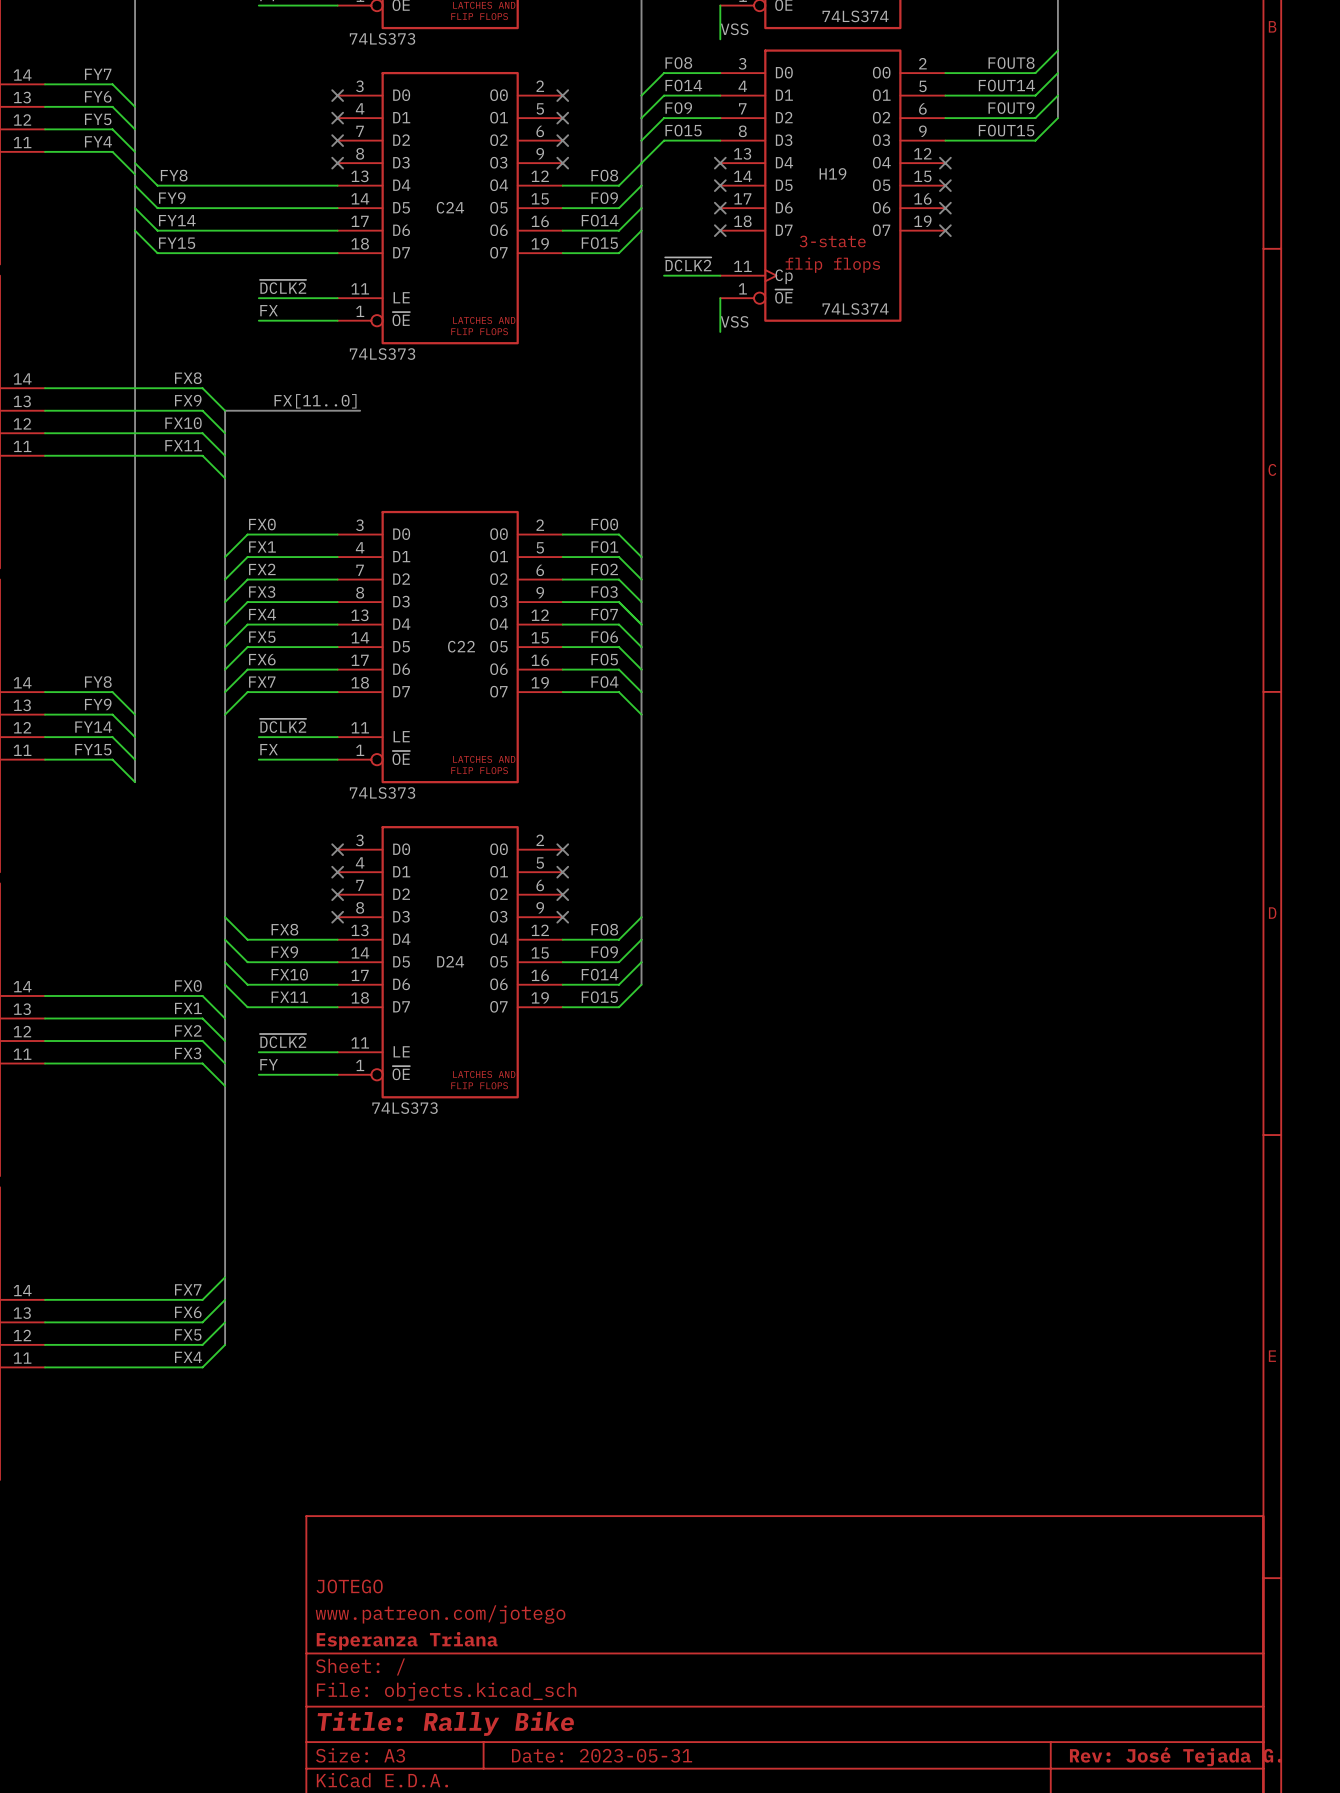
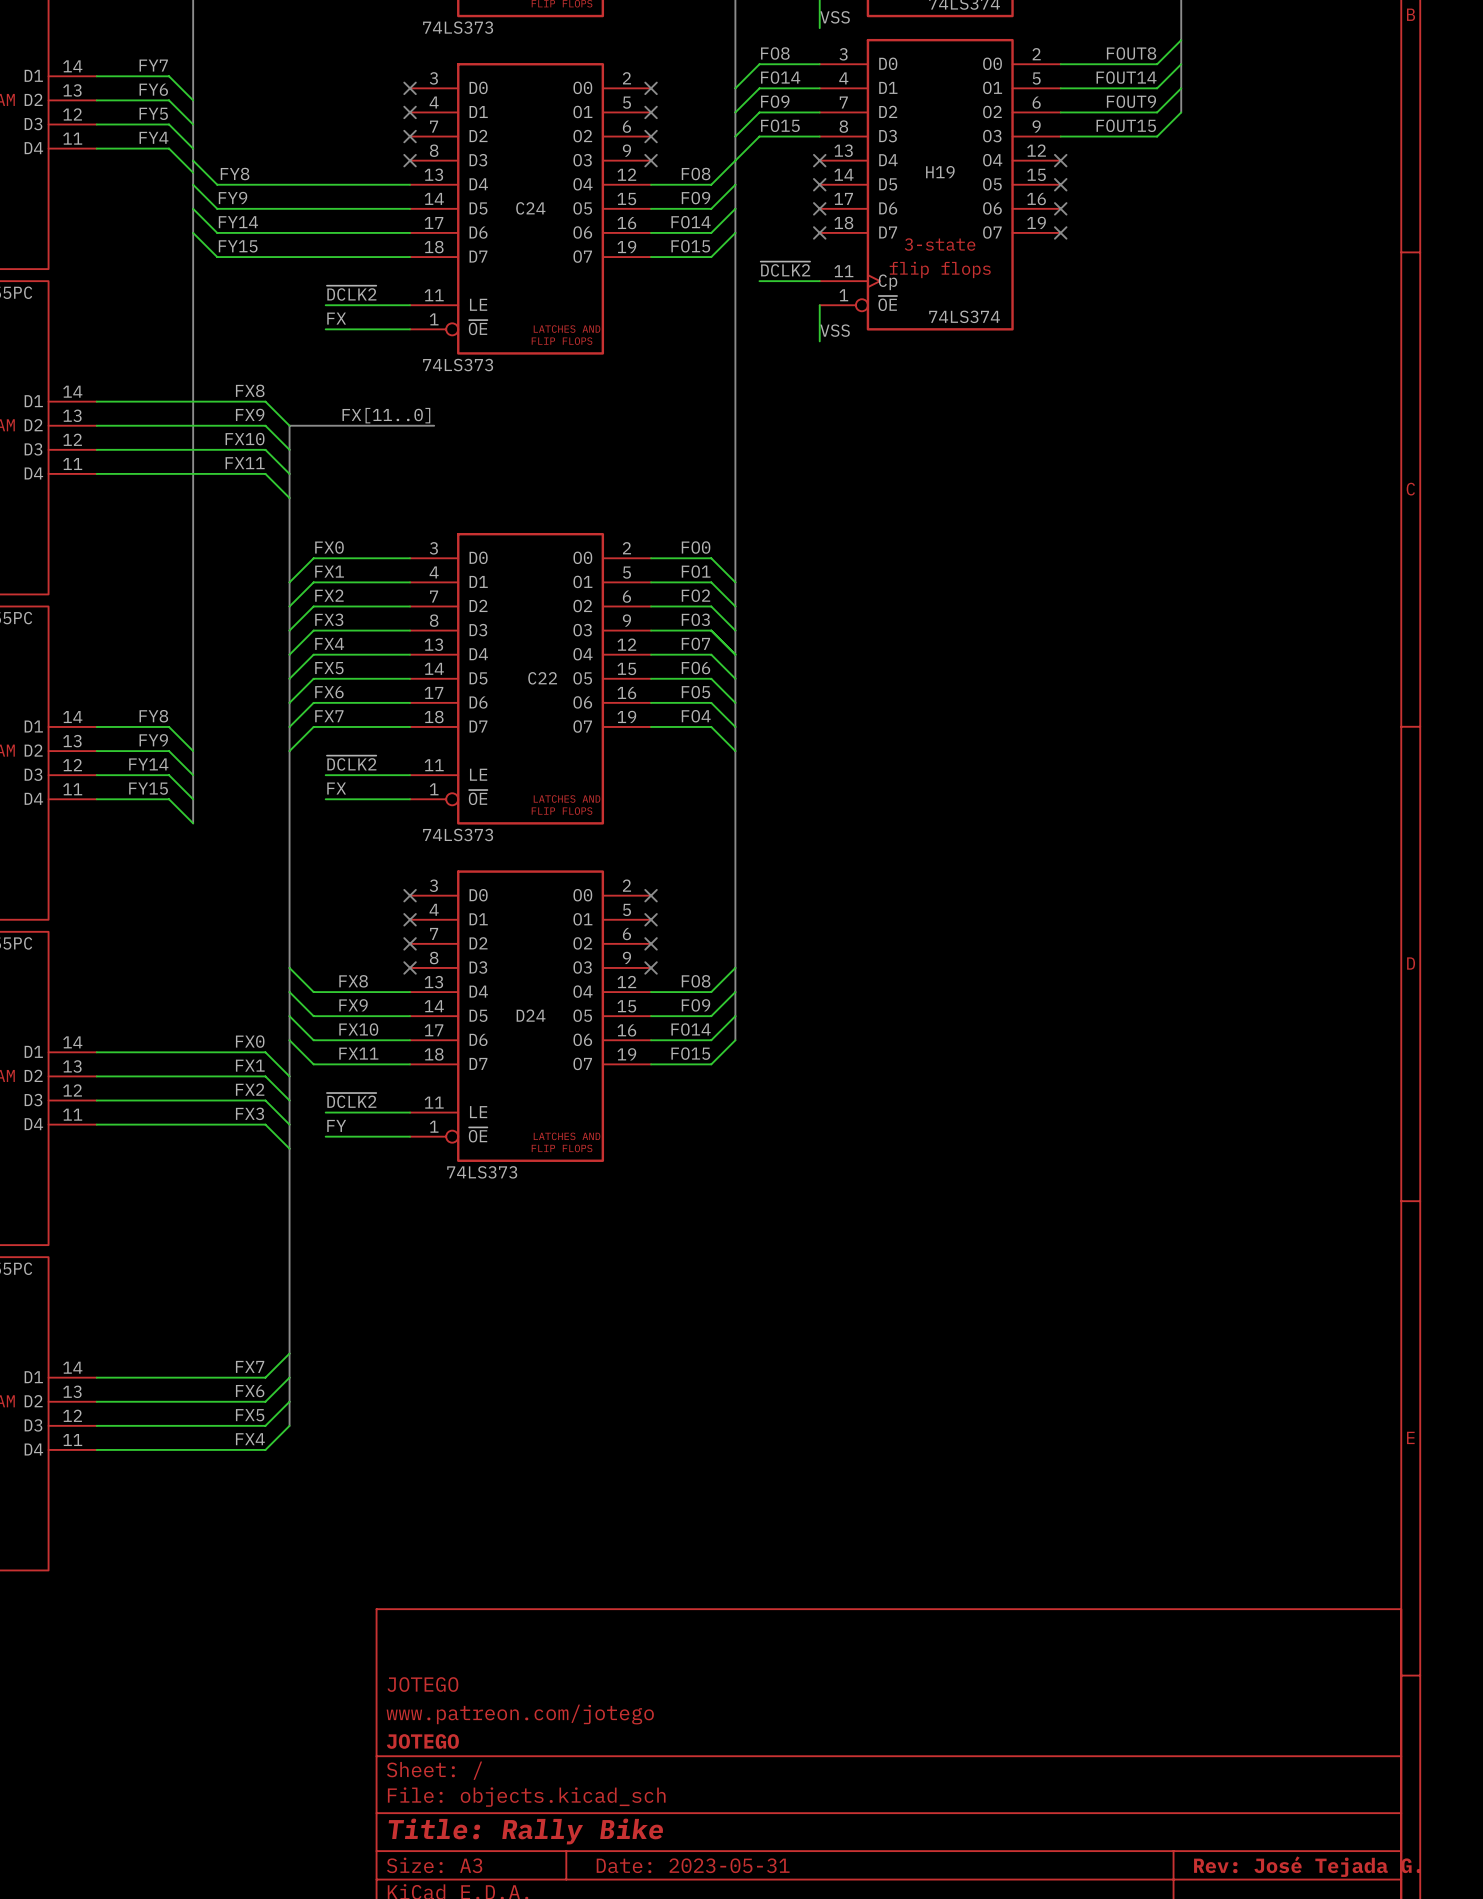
title block: Esperanza Triana (407, 1641) -> JOTEGO (422, 1741)

